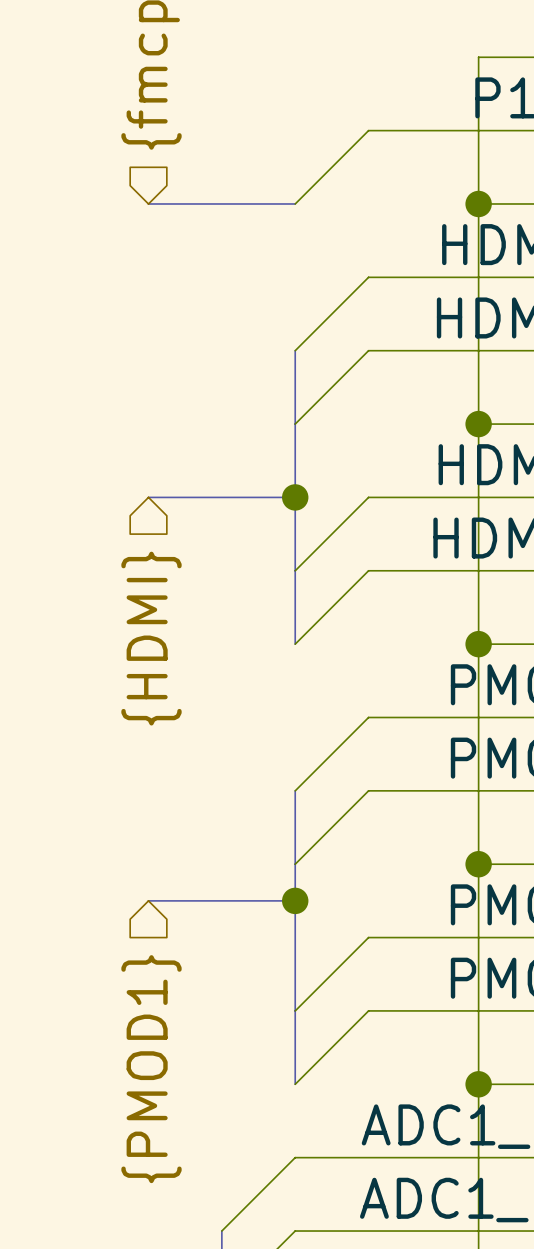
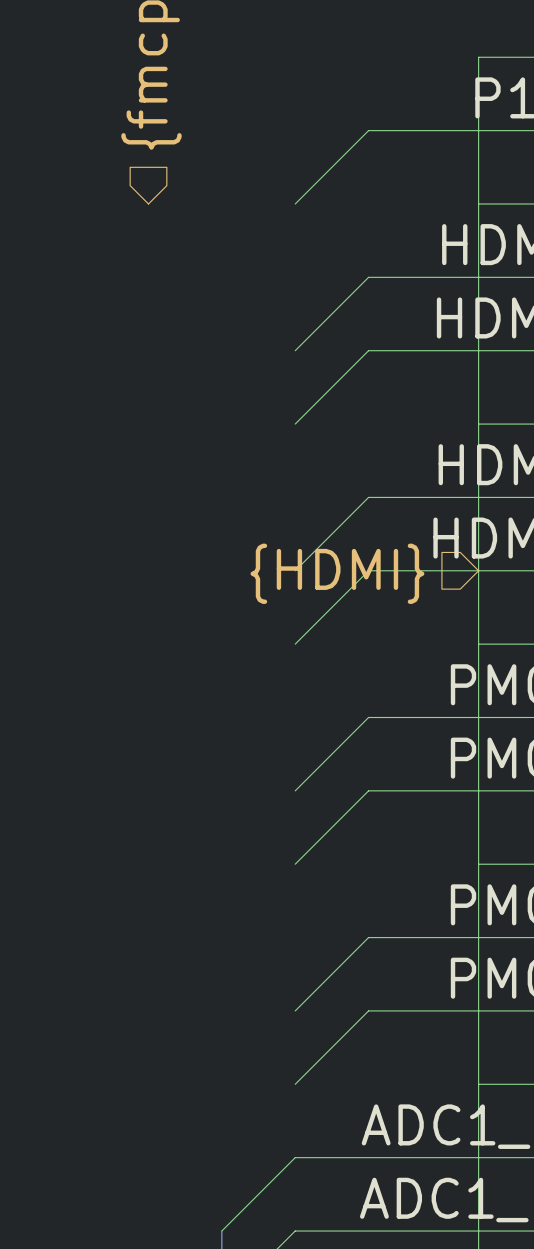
bus: (148, 203) (295, 203) -> none
junction: (478, 203) -> none
bus: (295, 350) (295, 644) -> none
junction: (478, 424) -> none
bus: (148, 497) (295, 497) -> none
junction: (295, 497) -> none
hierarchical label rotation: 0° (151, 638) -> 90° clockwise (337, 573)
junction: (478, 644) -> none
bus: (295, 790) (295, 1084) -> none
junction: (478, 864) -> none
bus: (148, 900) (295, 900) -> none
junction: (295, 900) -> none
hierarchical label: {PMOD1} (151, 1069) -> none
junction: (478, 1084) -> none

